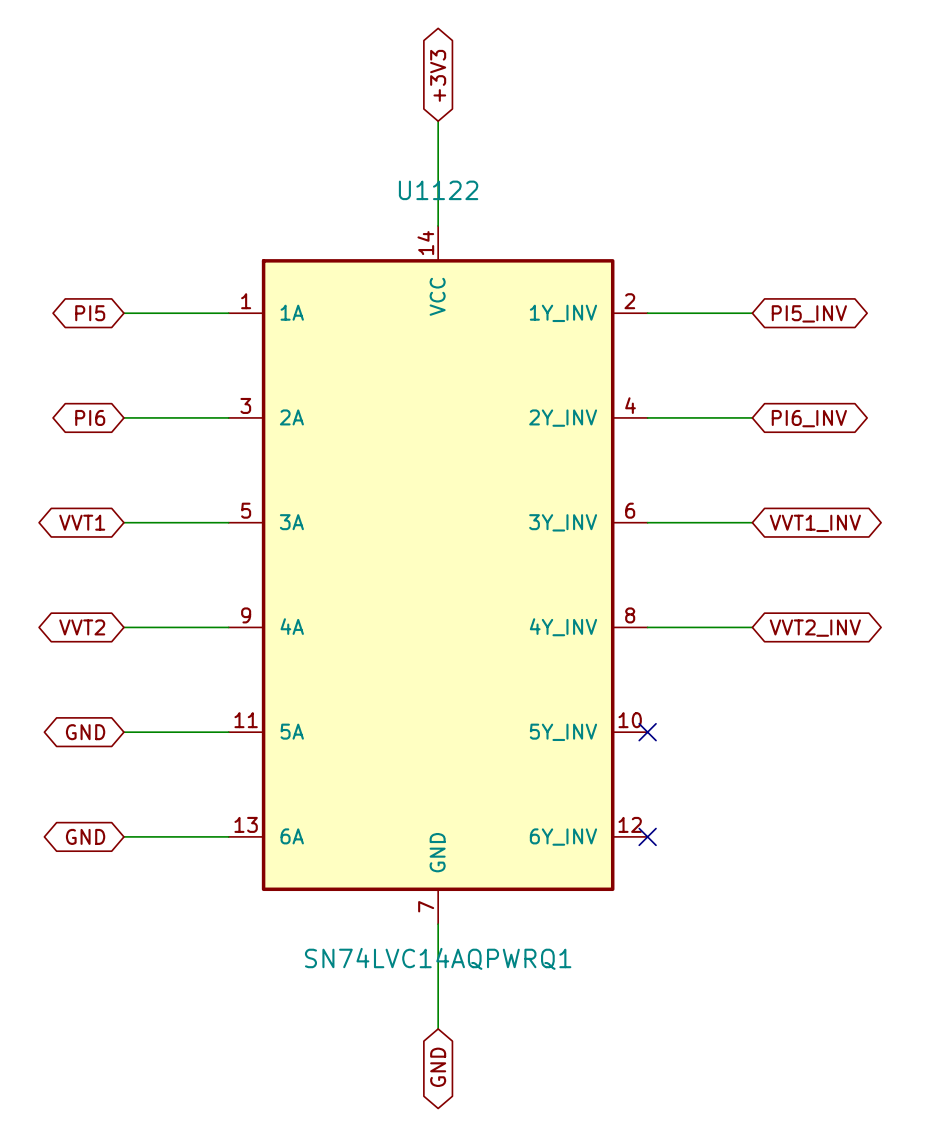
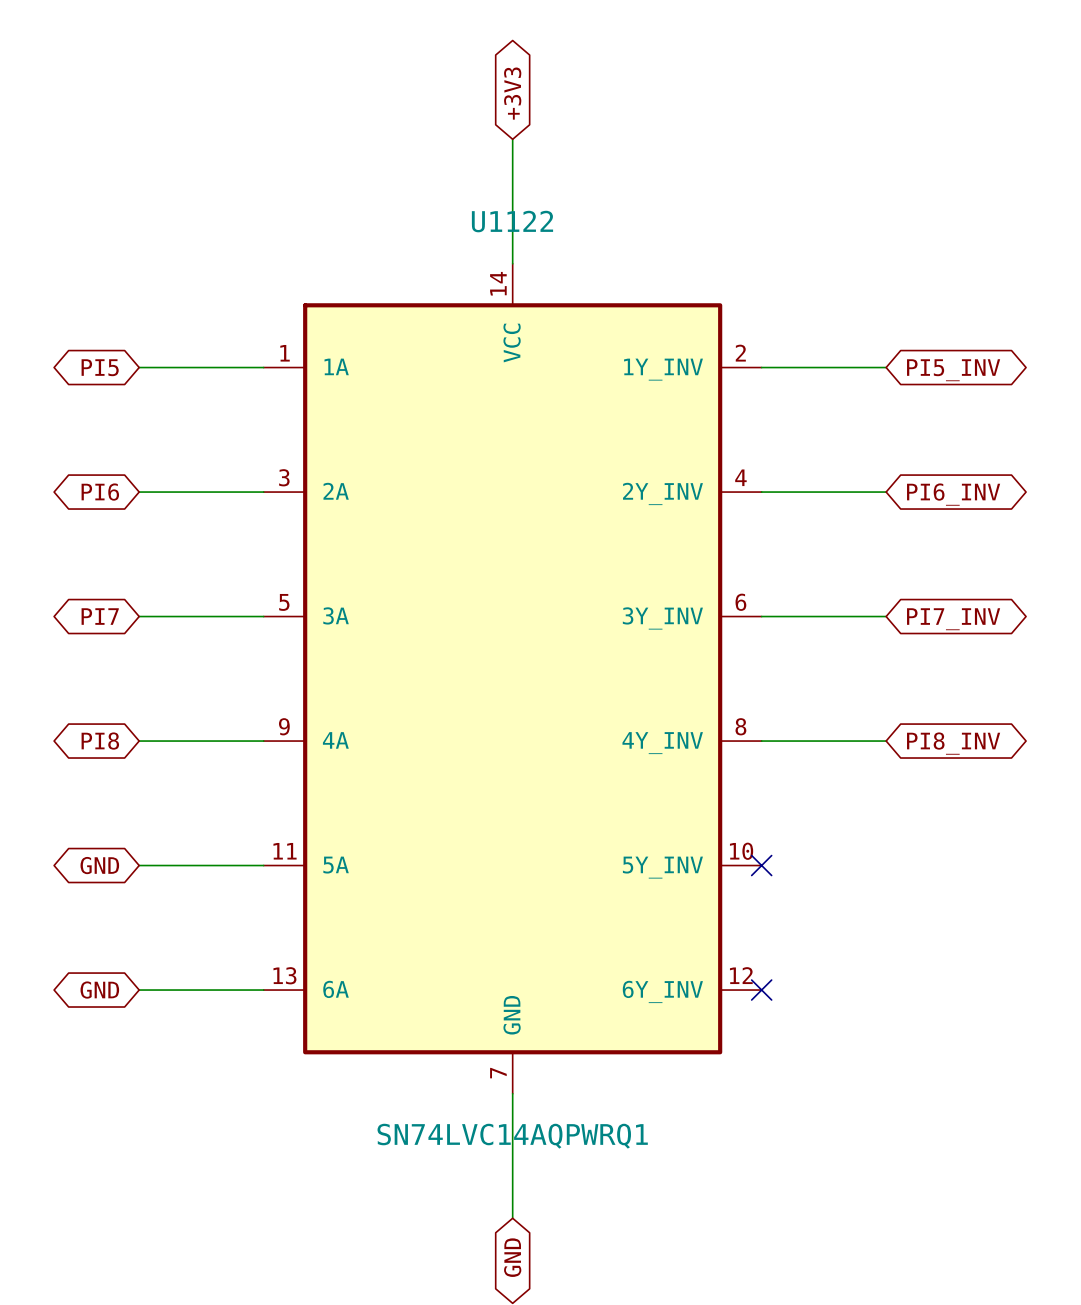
global label: VVT1 (82, 522) -> PI7 (100, 616)
global label: VVT1_INV (815, 523) -> PI7_INV (953, 619)
global label: VVT2 (82, 627) -> PI8 (100, 741)
global label: VVT2_INV (815, 628) -> PI8_INV (953, 743)

